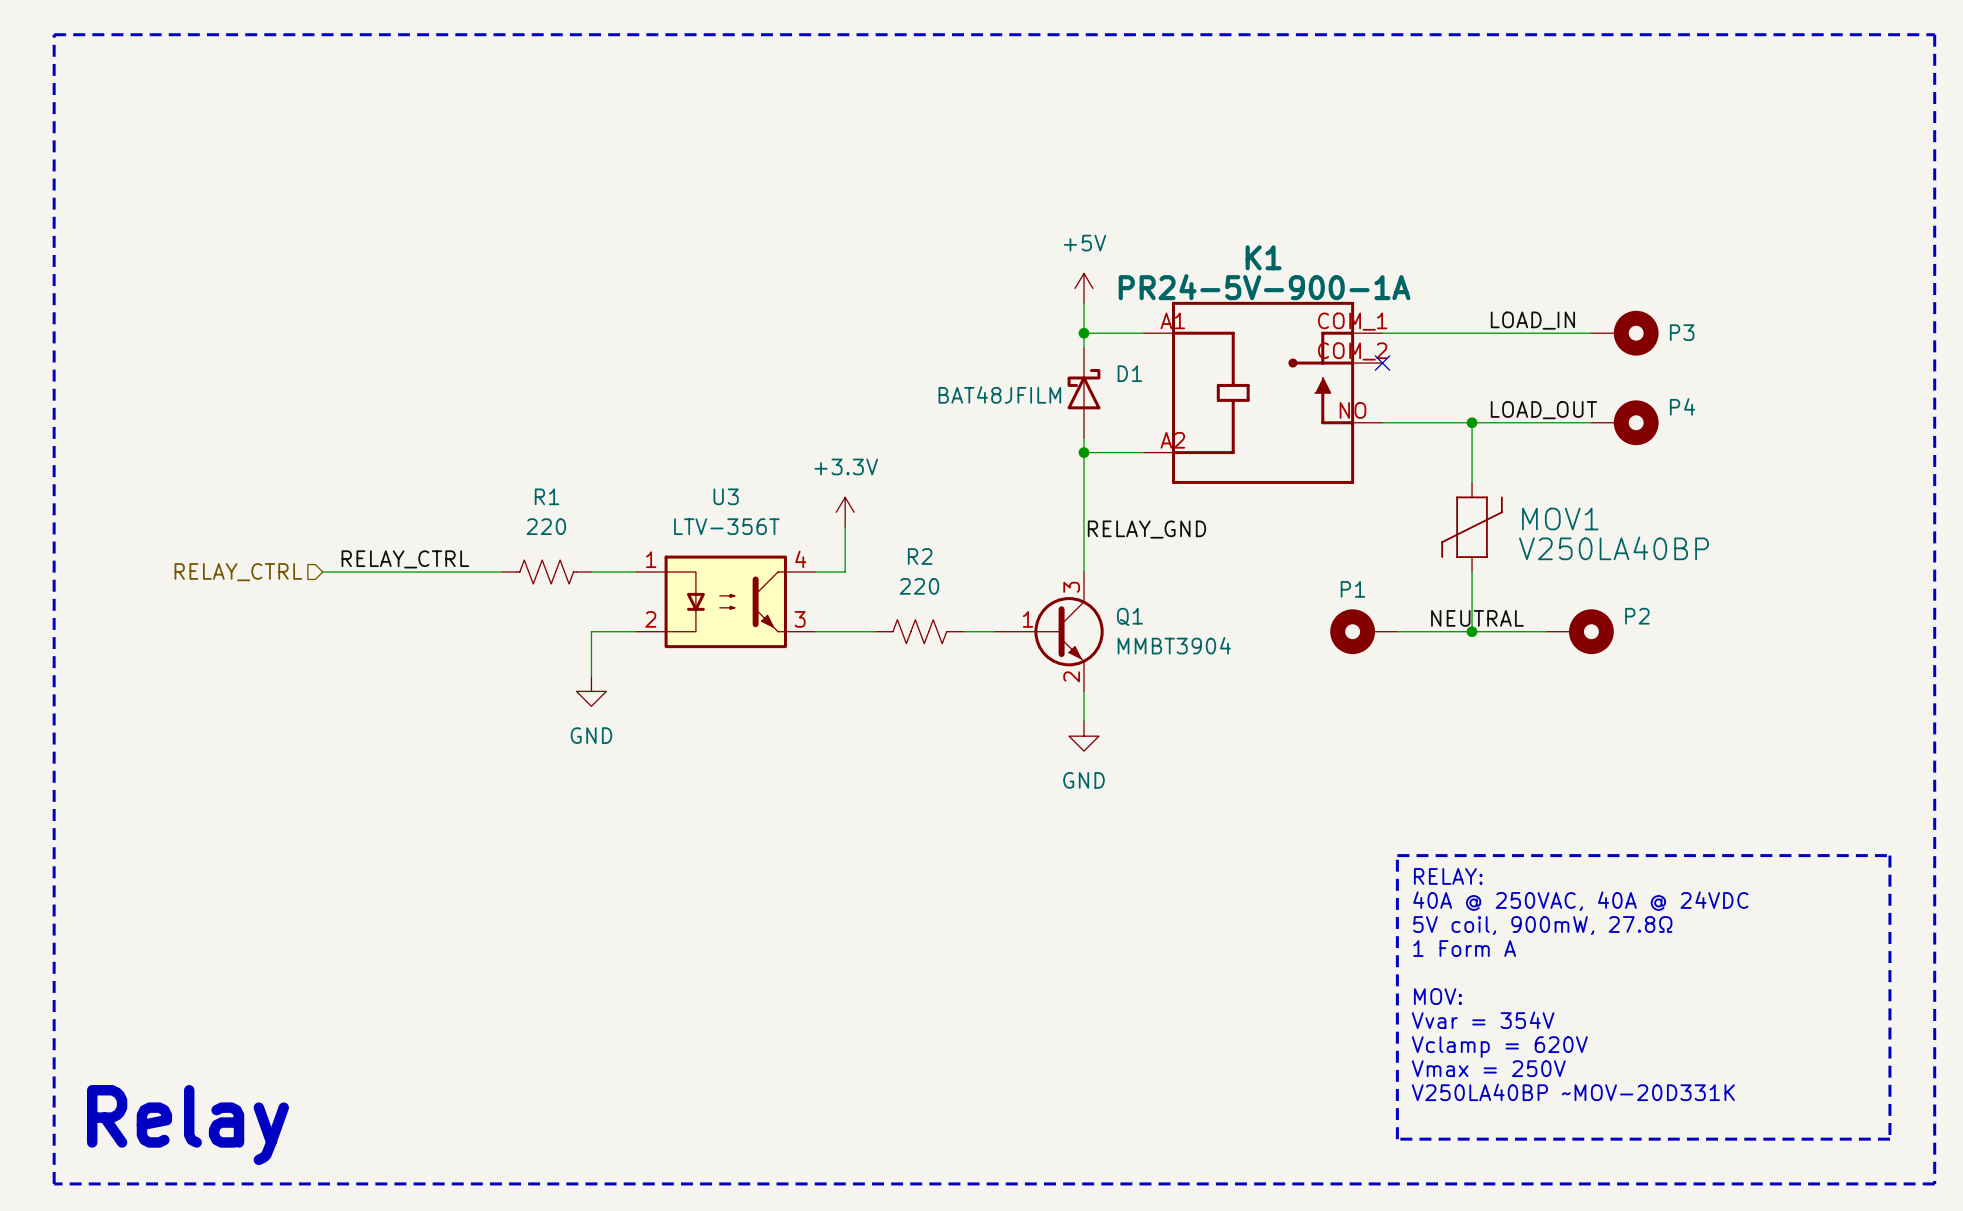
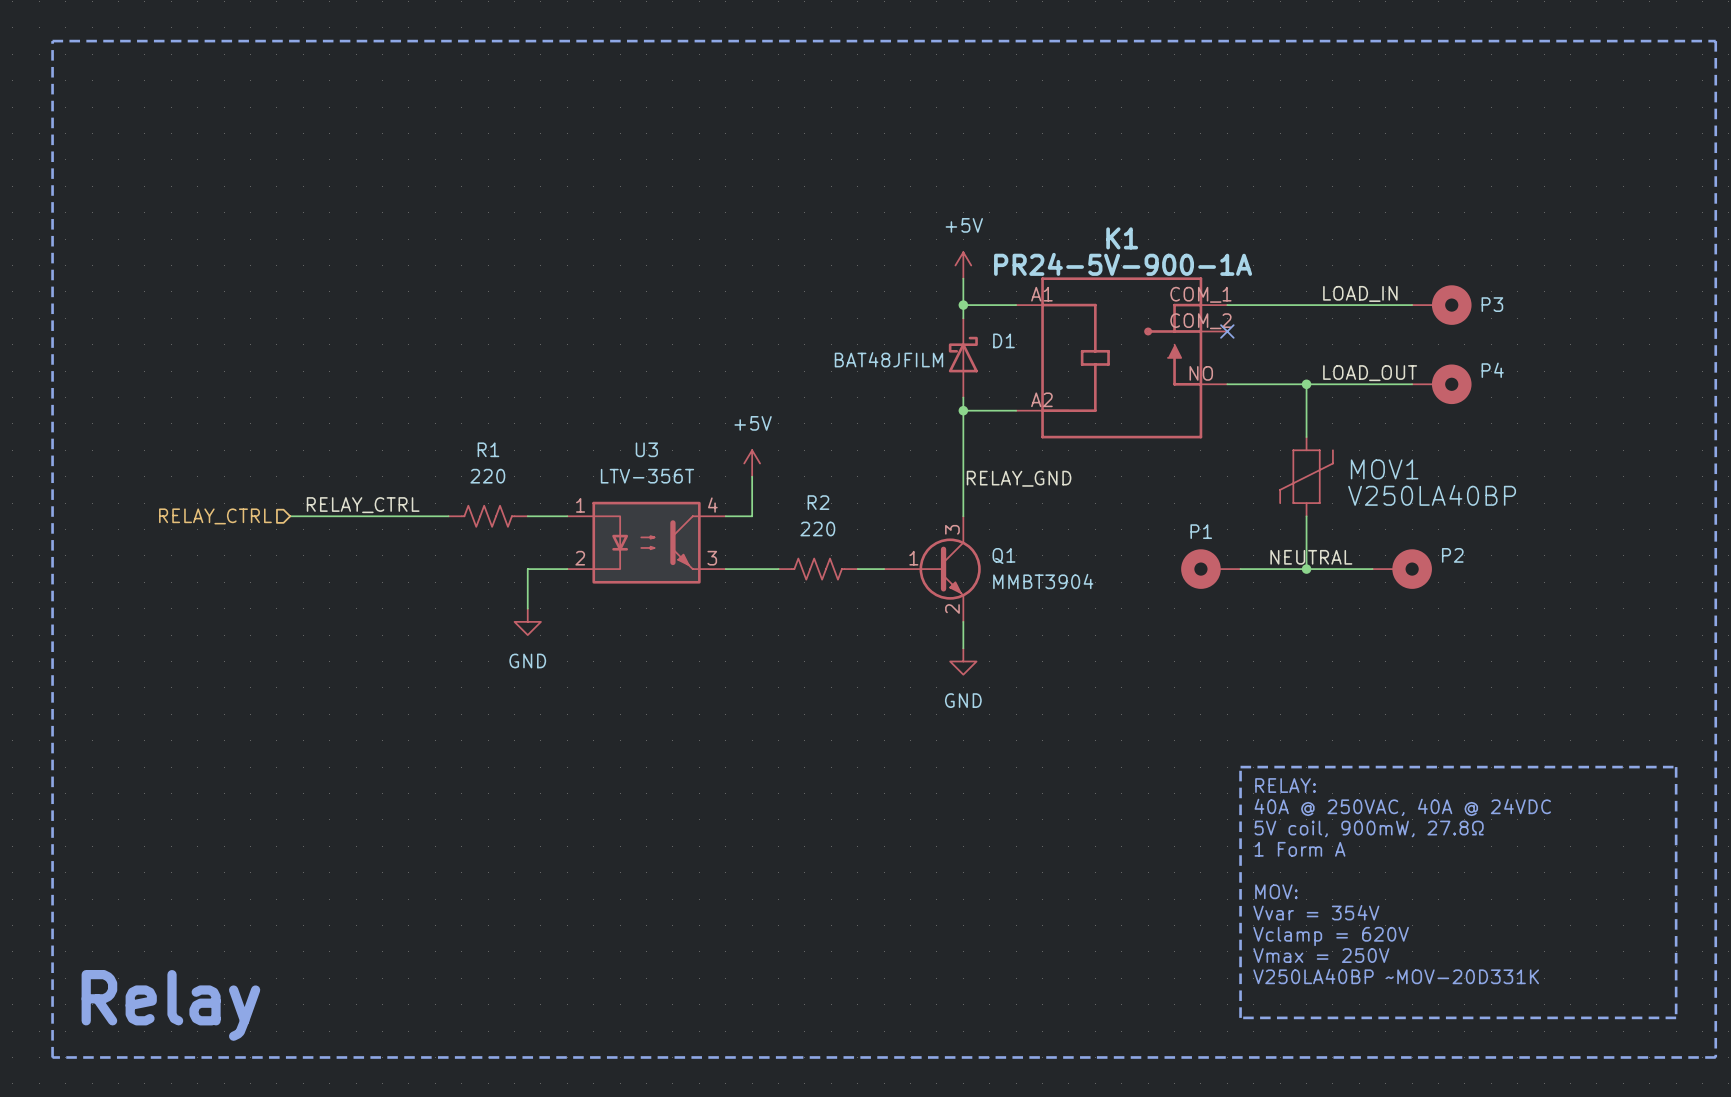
power symbol: +3.3V (845, 512) -> +5V (752, 463)

